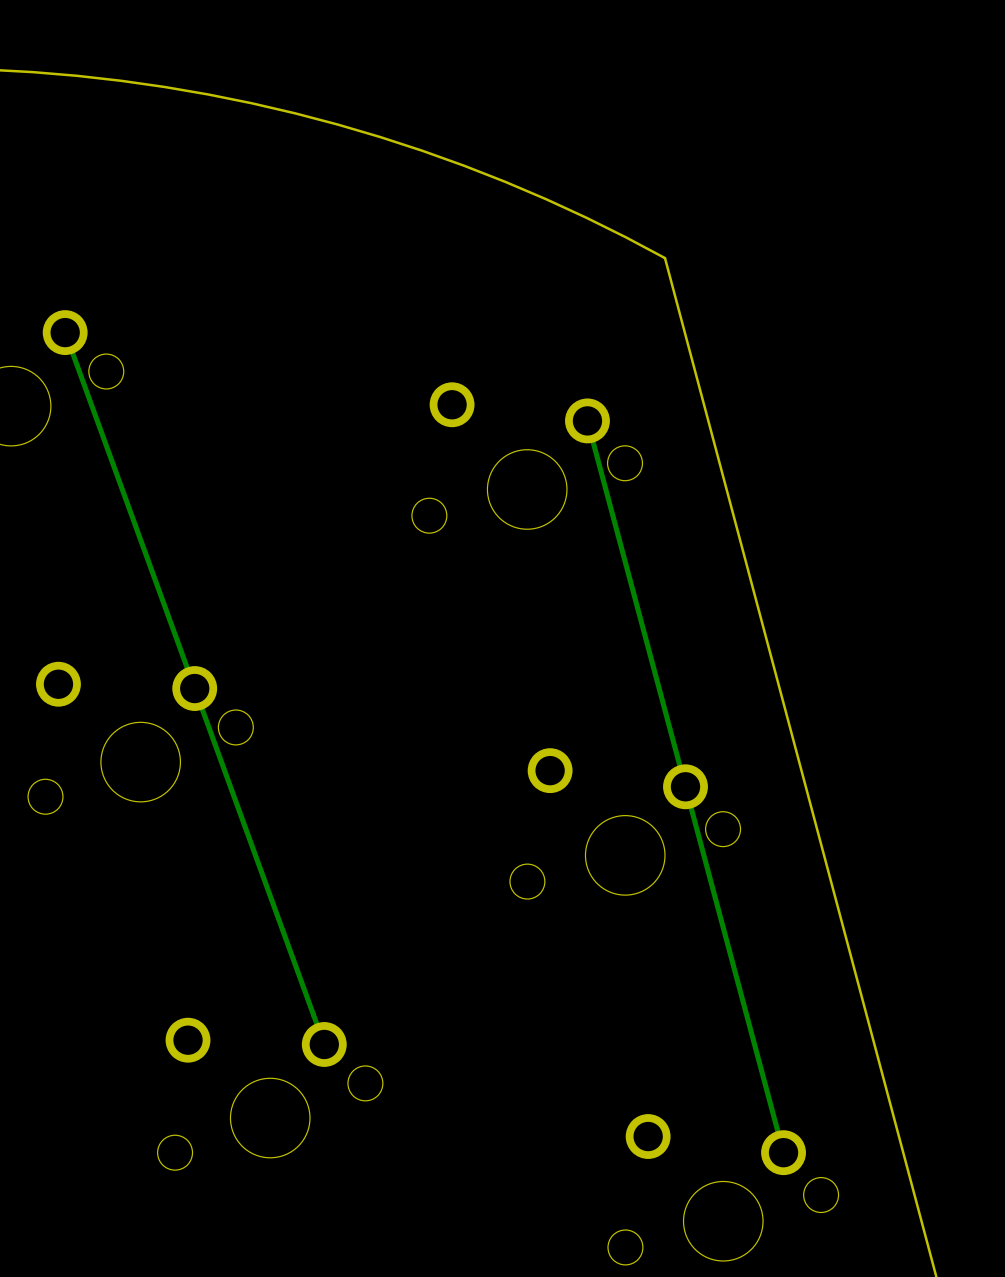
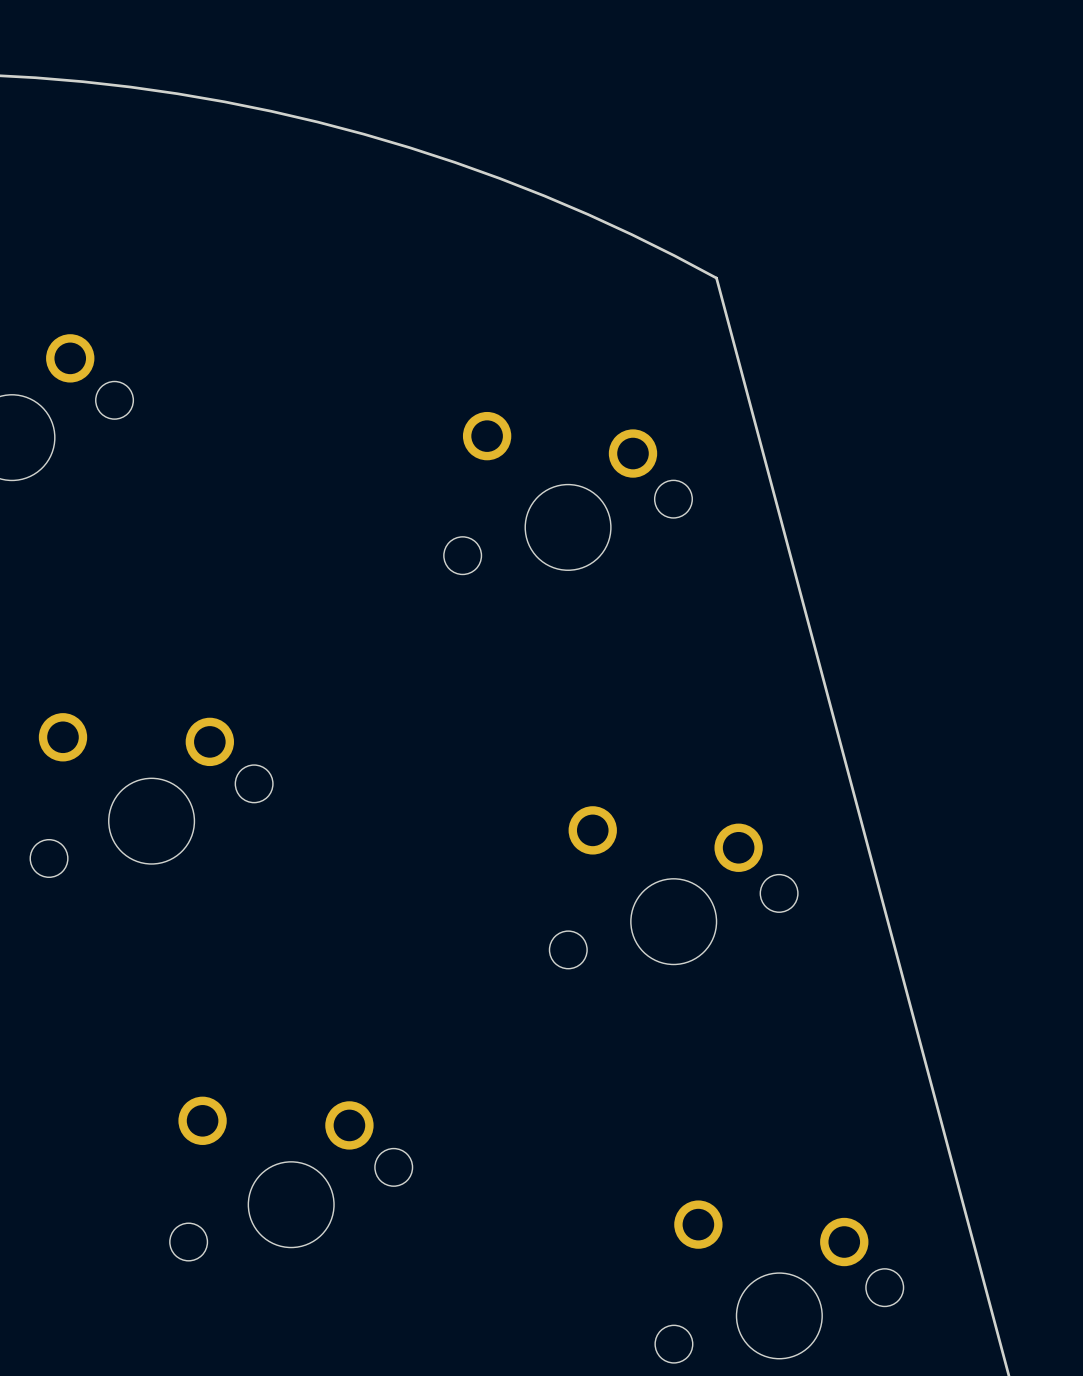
track: (65, 332) (324, 1044) -> none
track: (587, 420) (783, 1152) -> none

